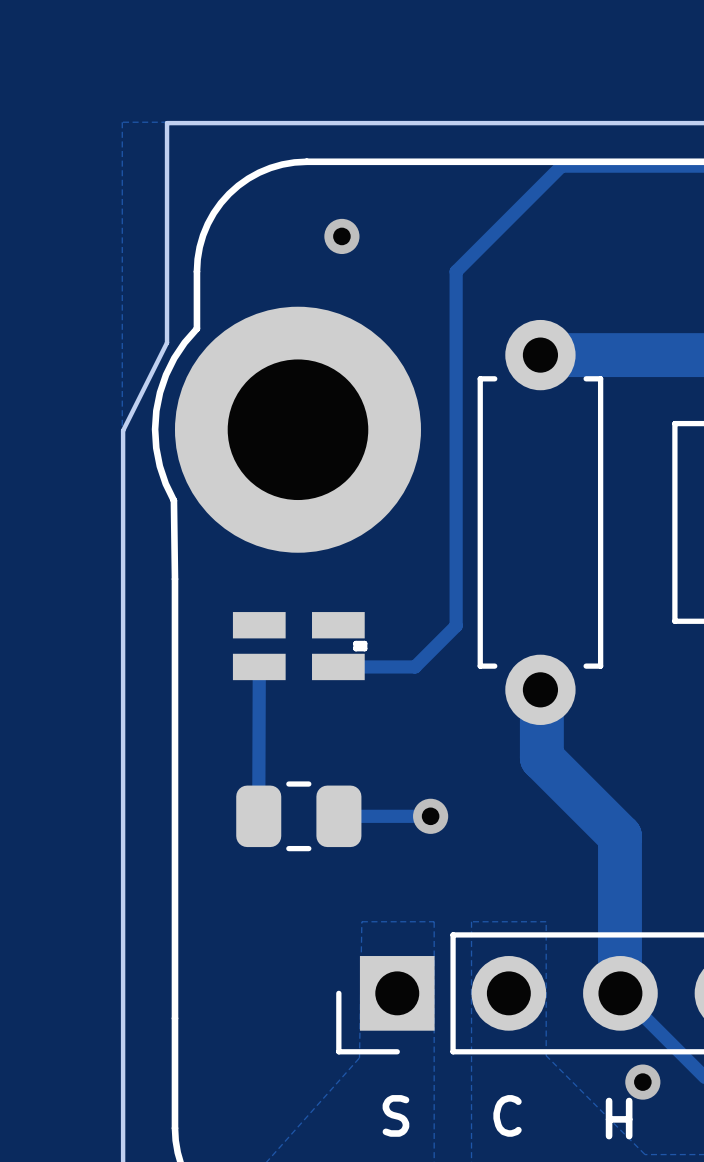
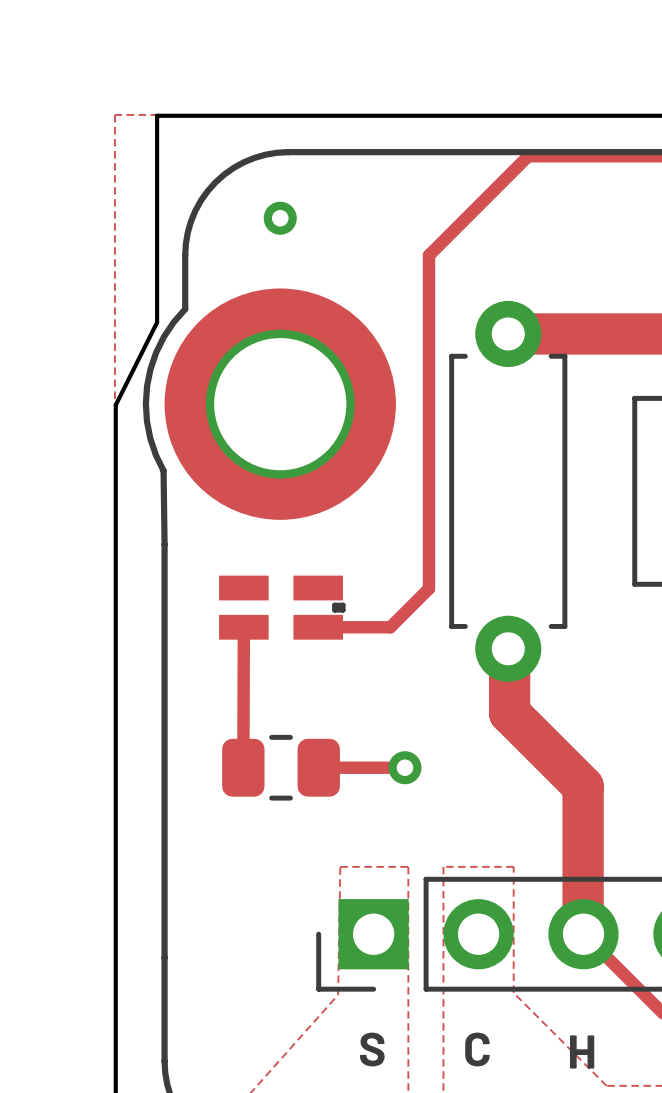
via: none -> (280, 218)
via: (341, 236) -> none
via: (642, 1082) -> none

